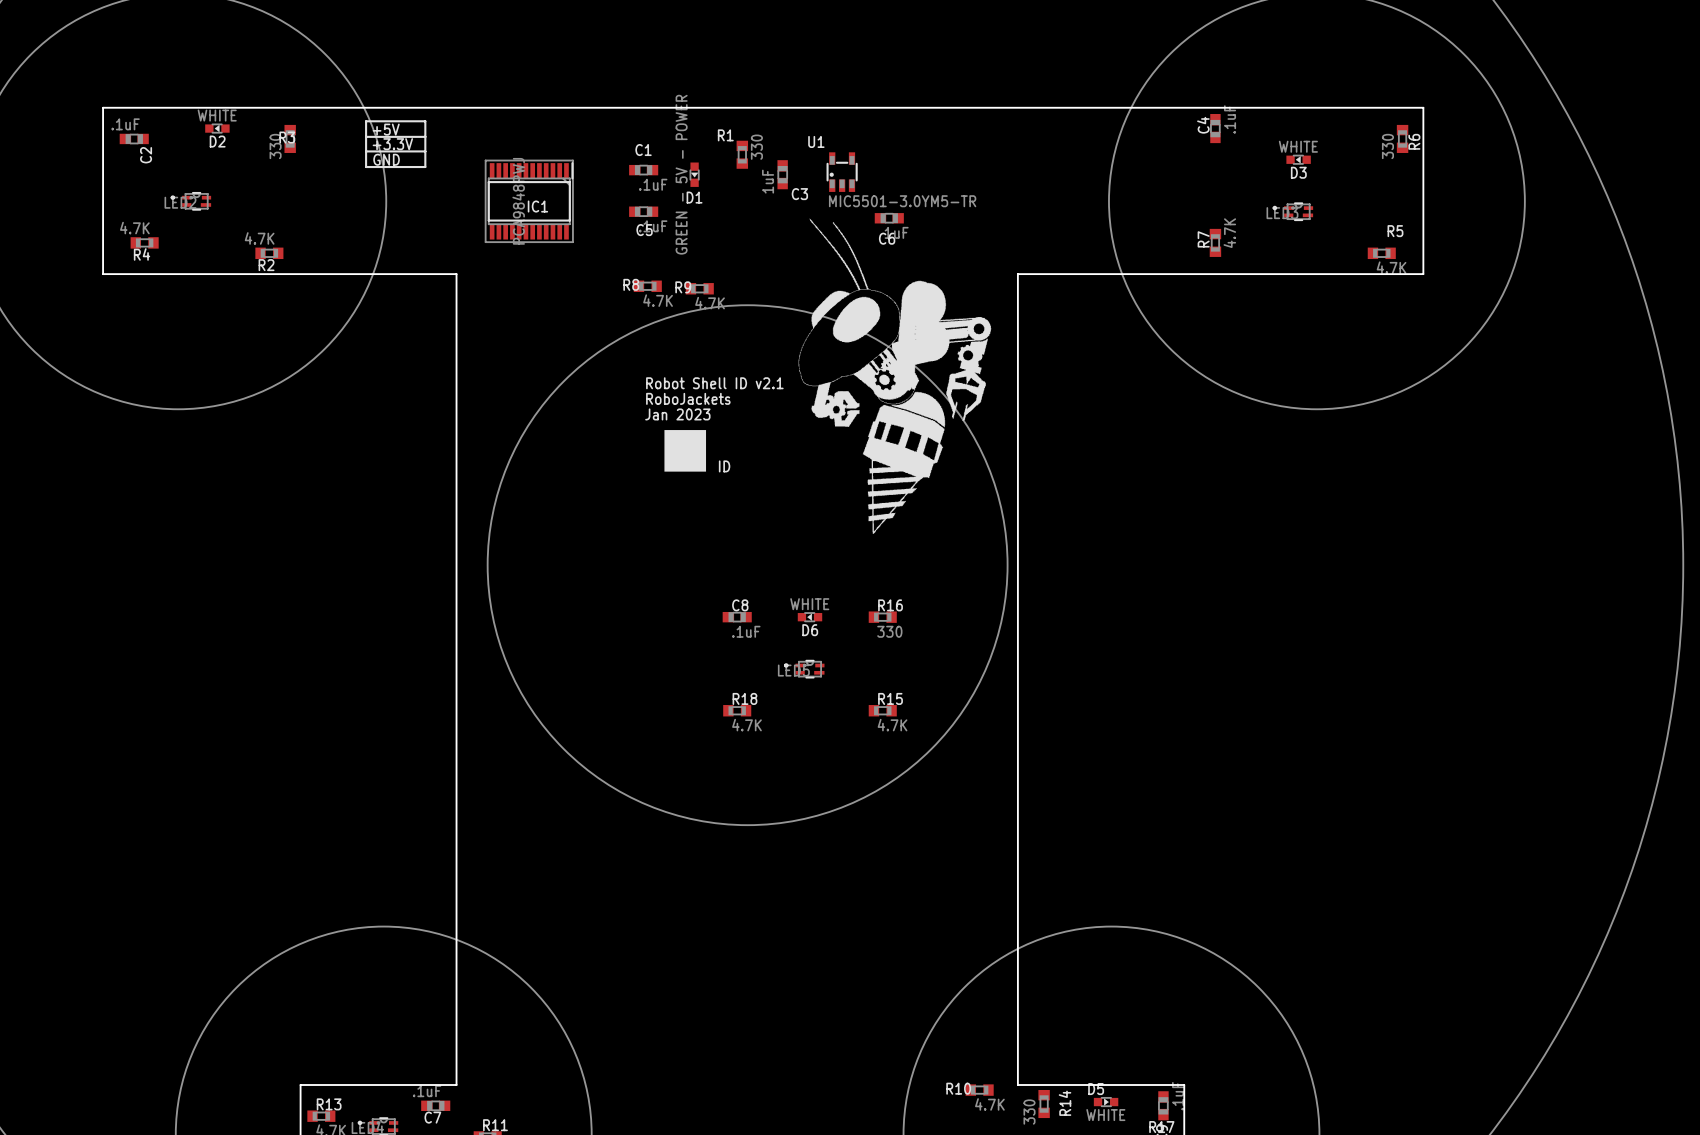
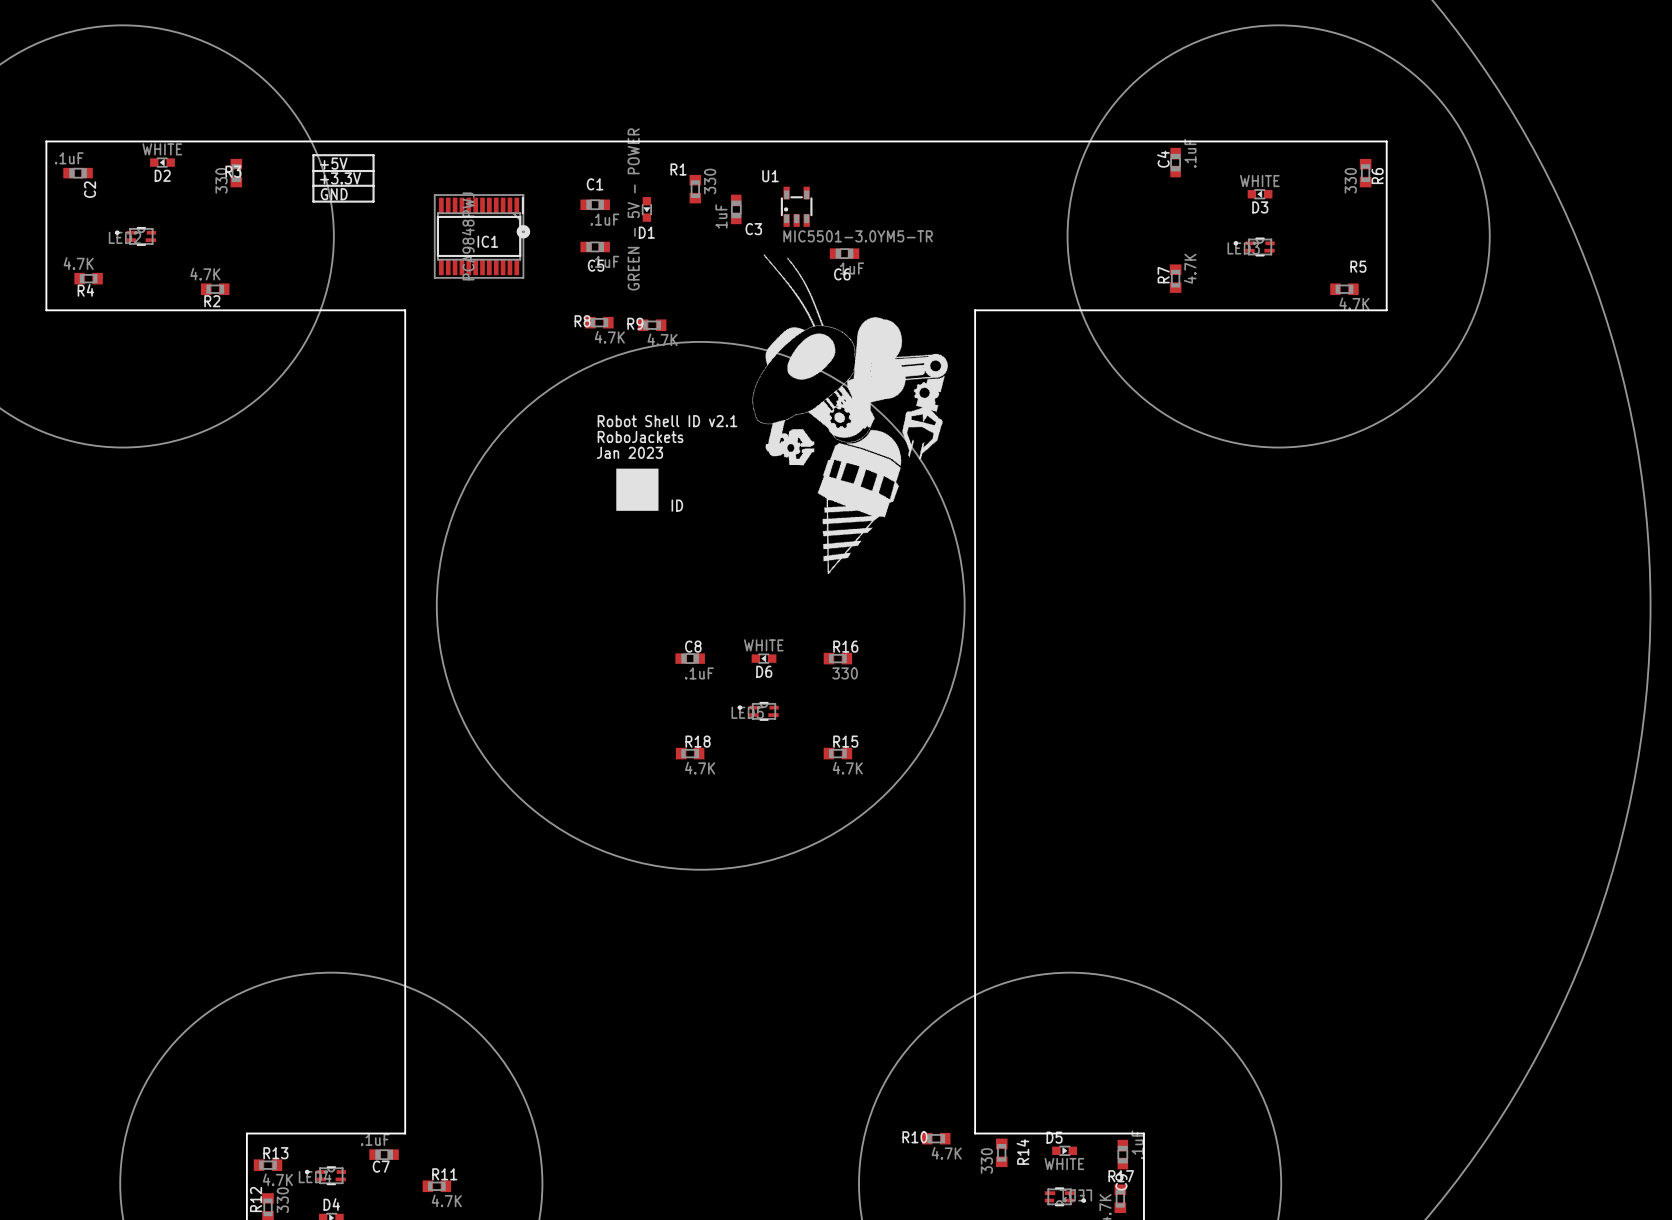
part: none -> (523, 231)

